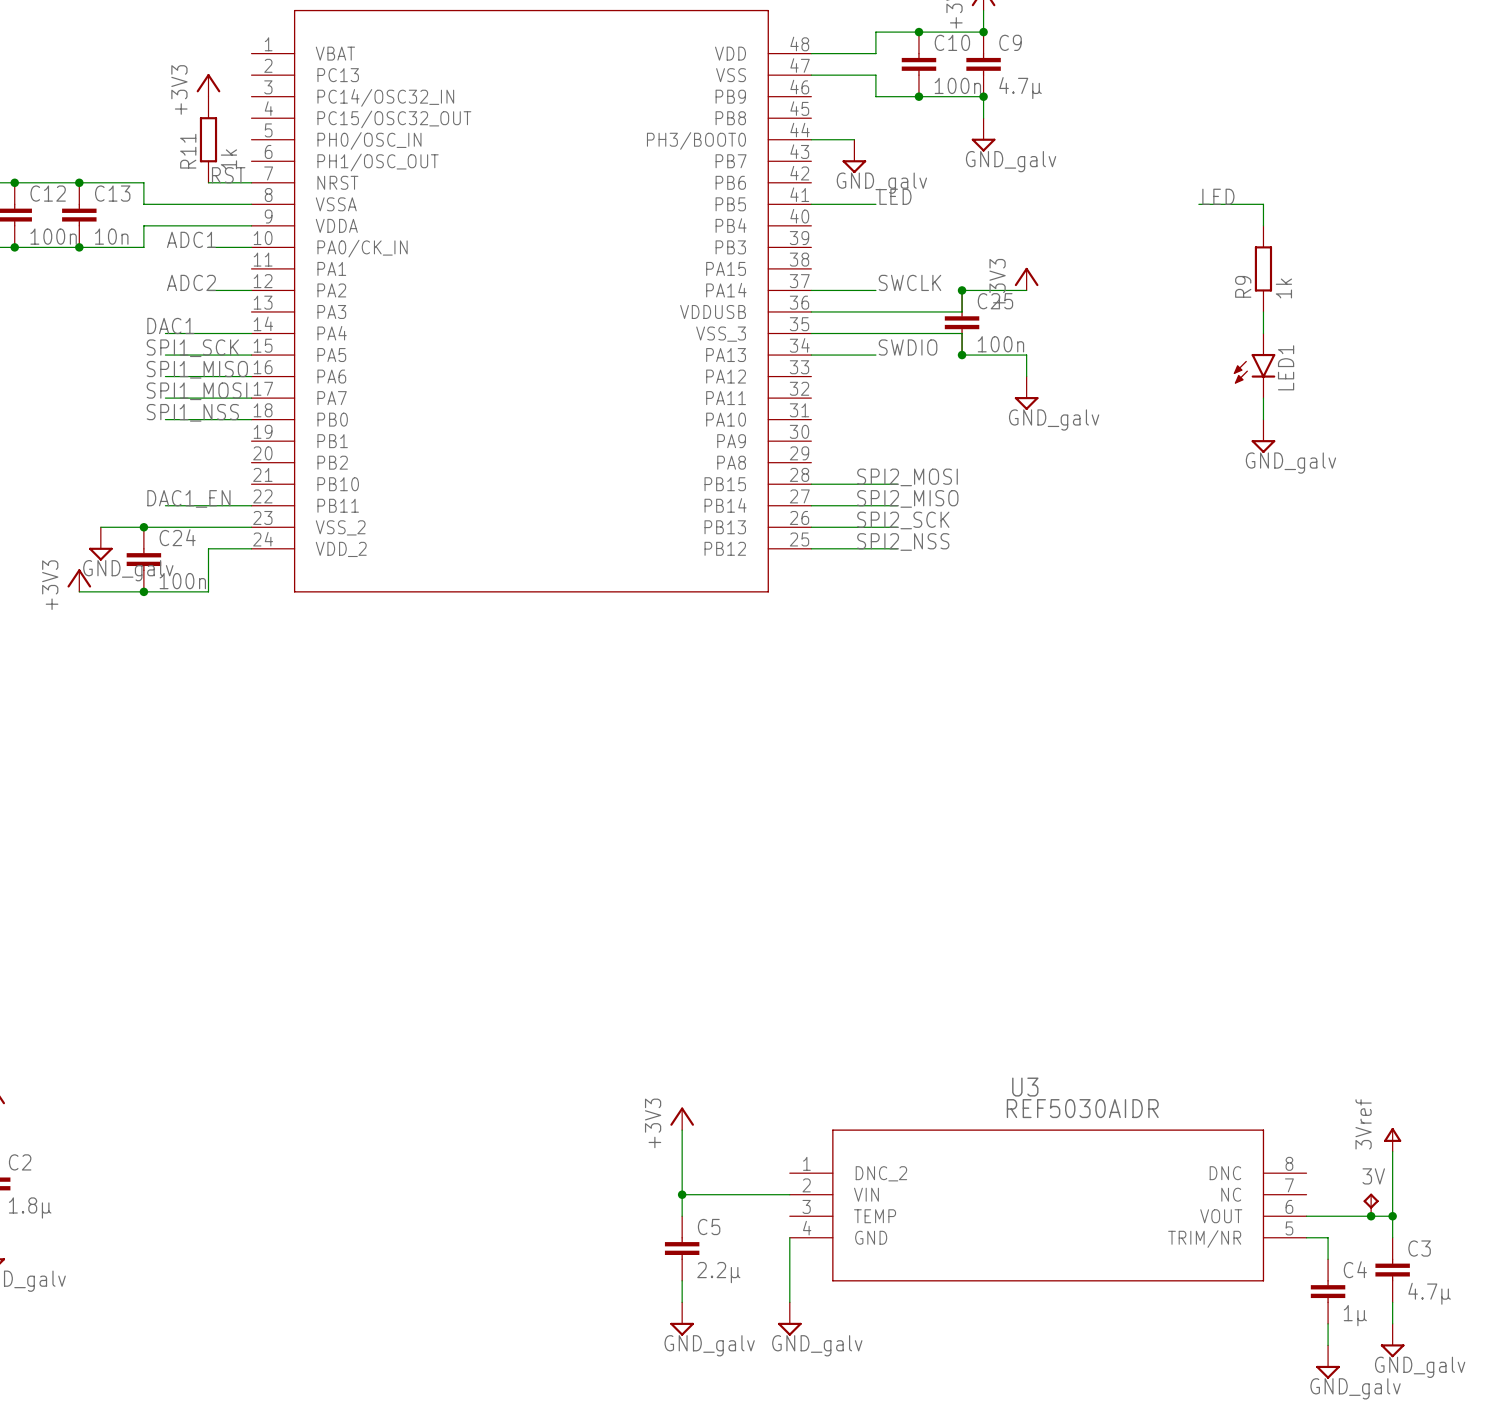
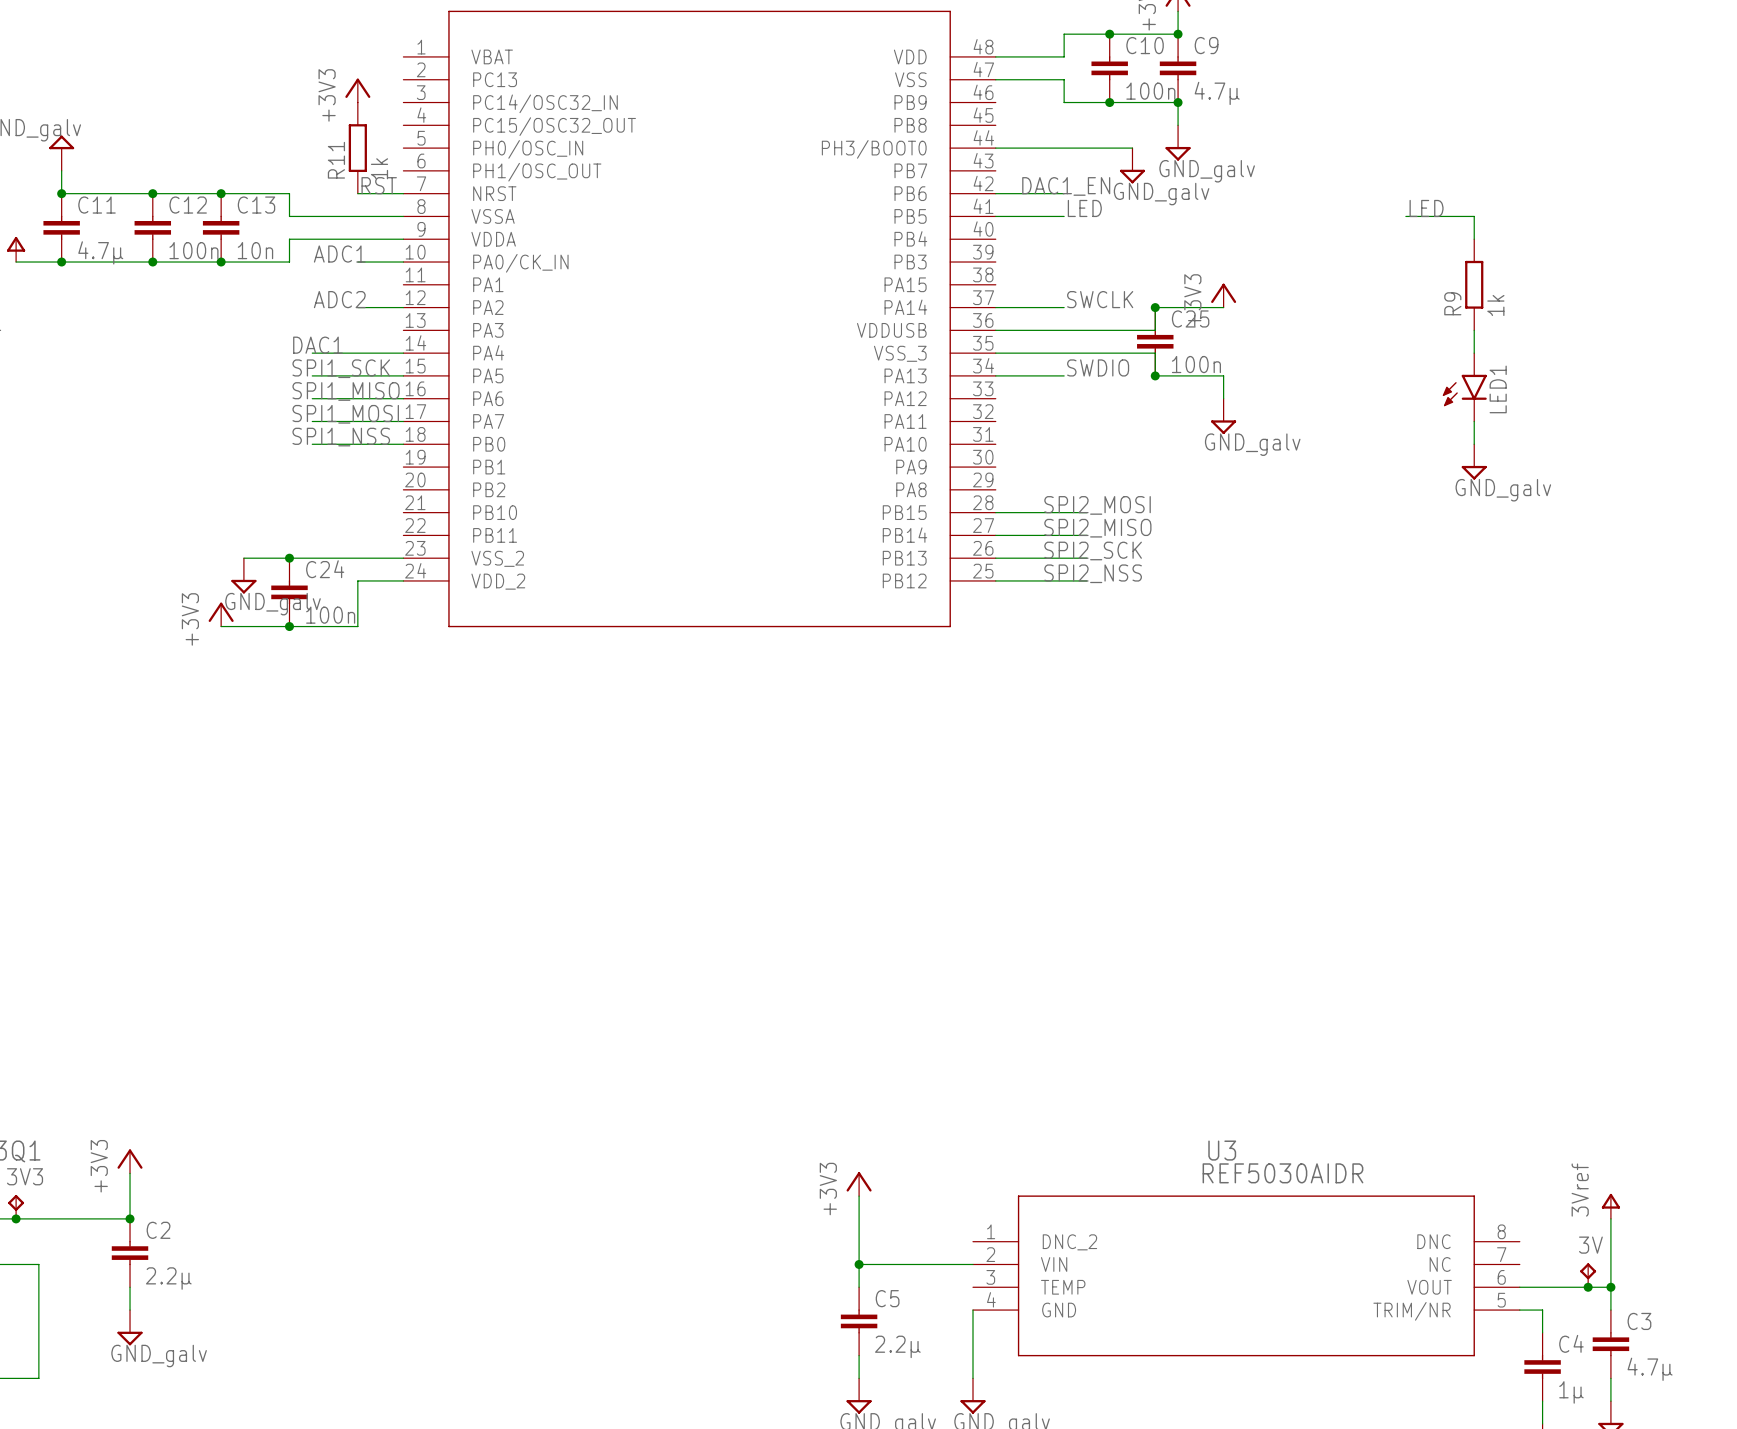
wire: none -> (1041, 148) (1132, 148)
power symbol position: GND_galv (854, 156) -> GND_galv (1132, 165)
label: none -> DAC1_EN (1066, 186)
wire: none -> (995, 193) (1064, 193)
label: DAC1_EN (188, 498) -> none
wire: (165, 505) (251, 505) -> none
C2 value: 1.8µ (30, 1207) -> 2.2µ (168, 1278)

